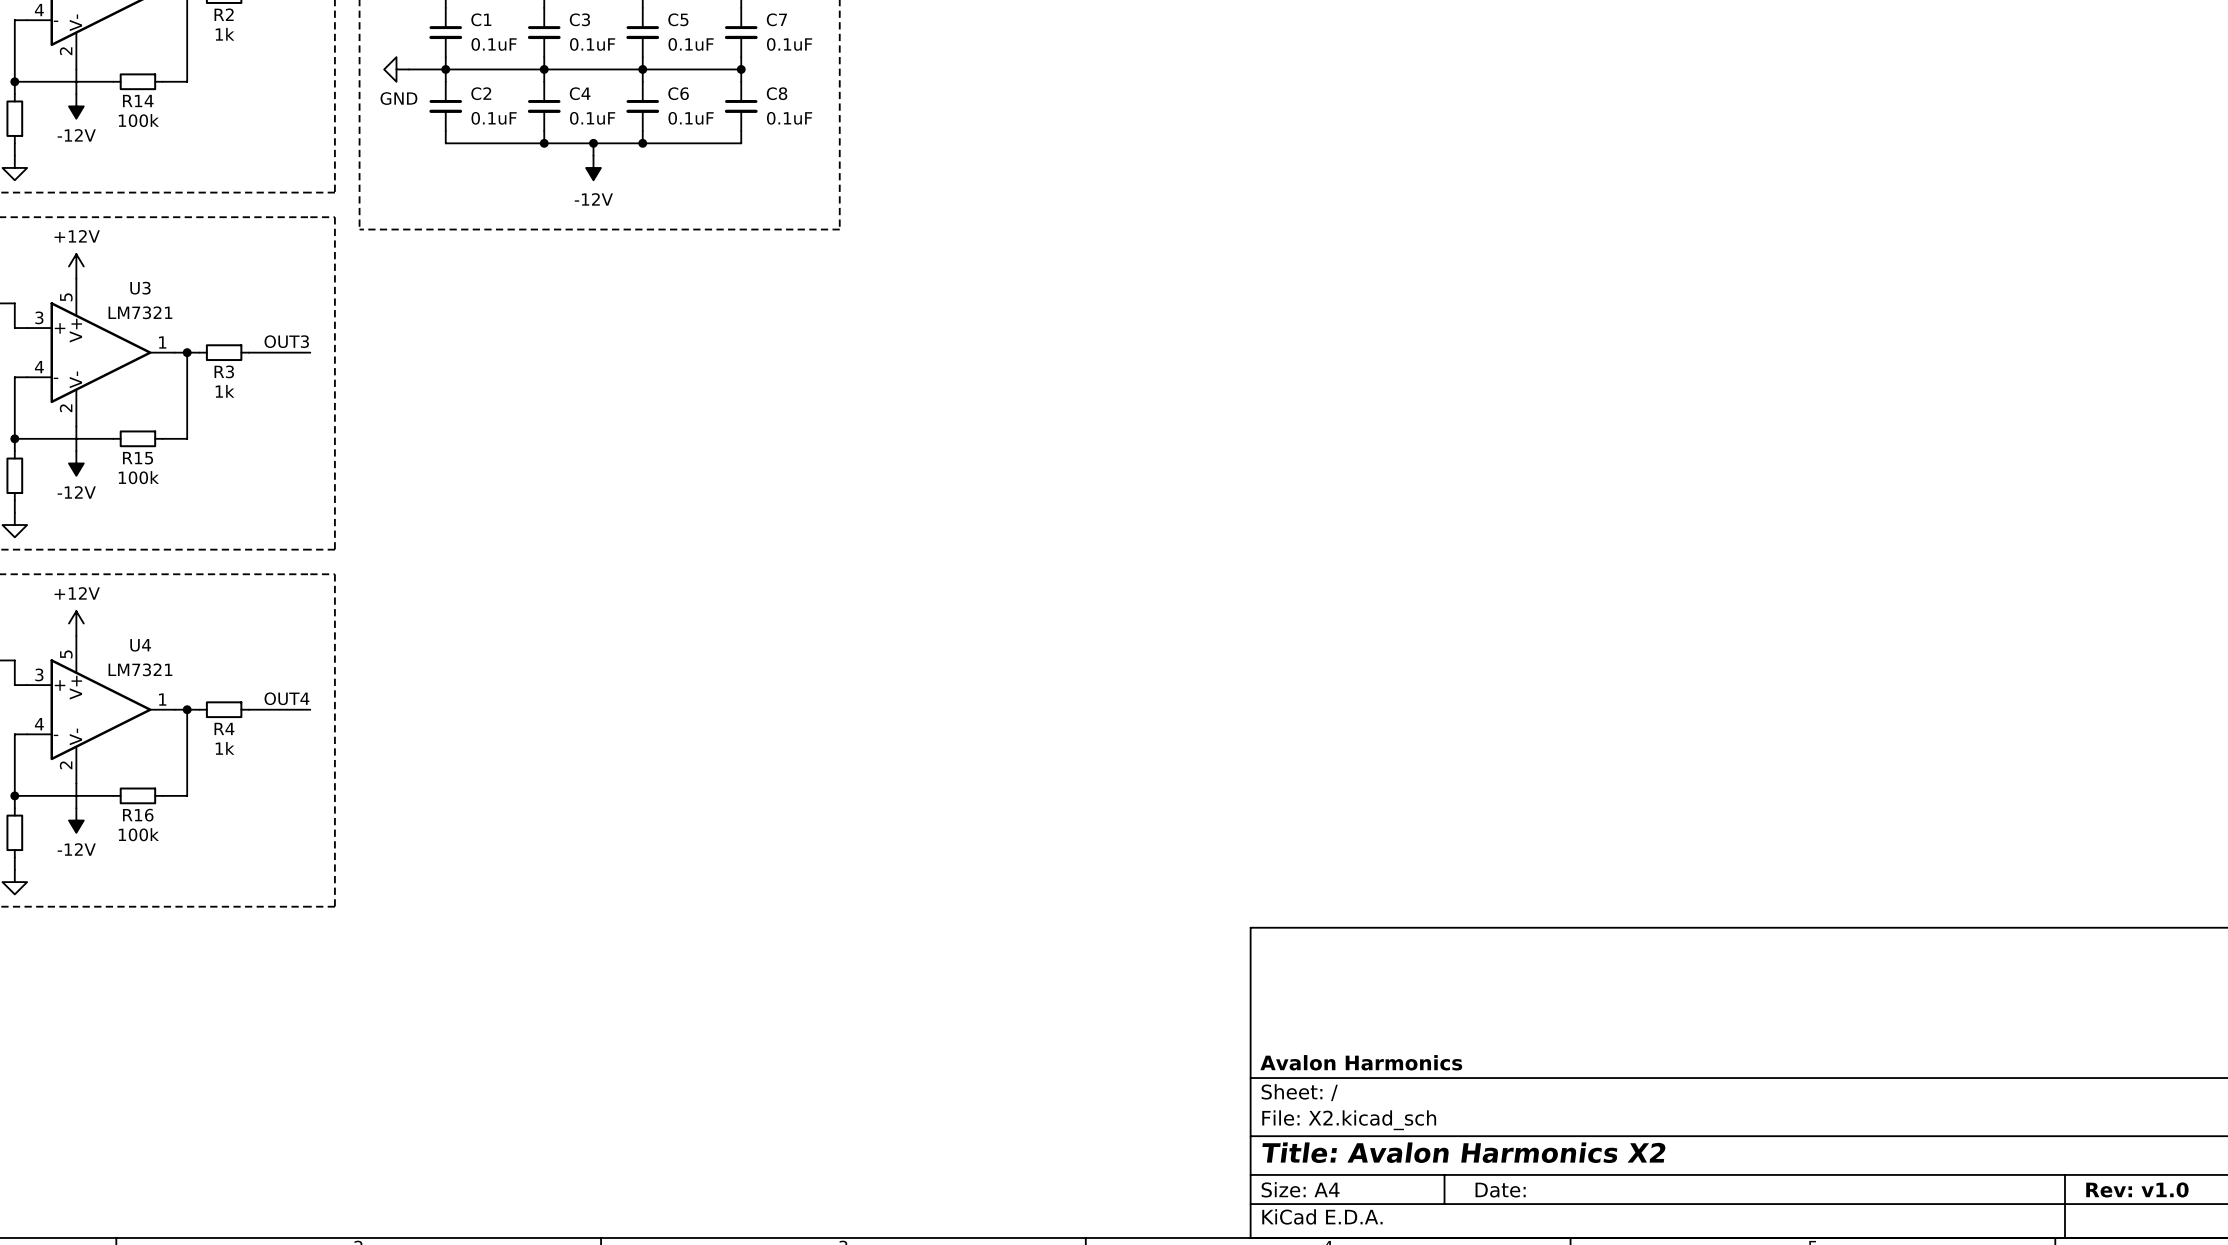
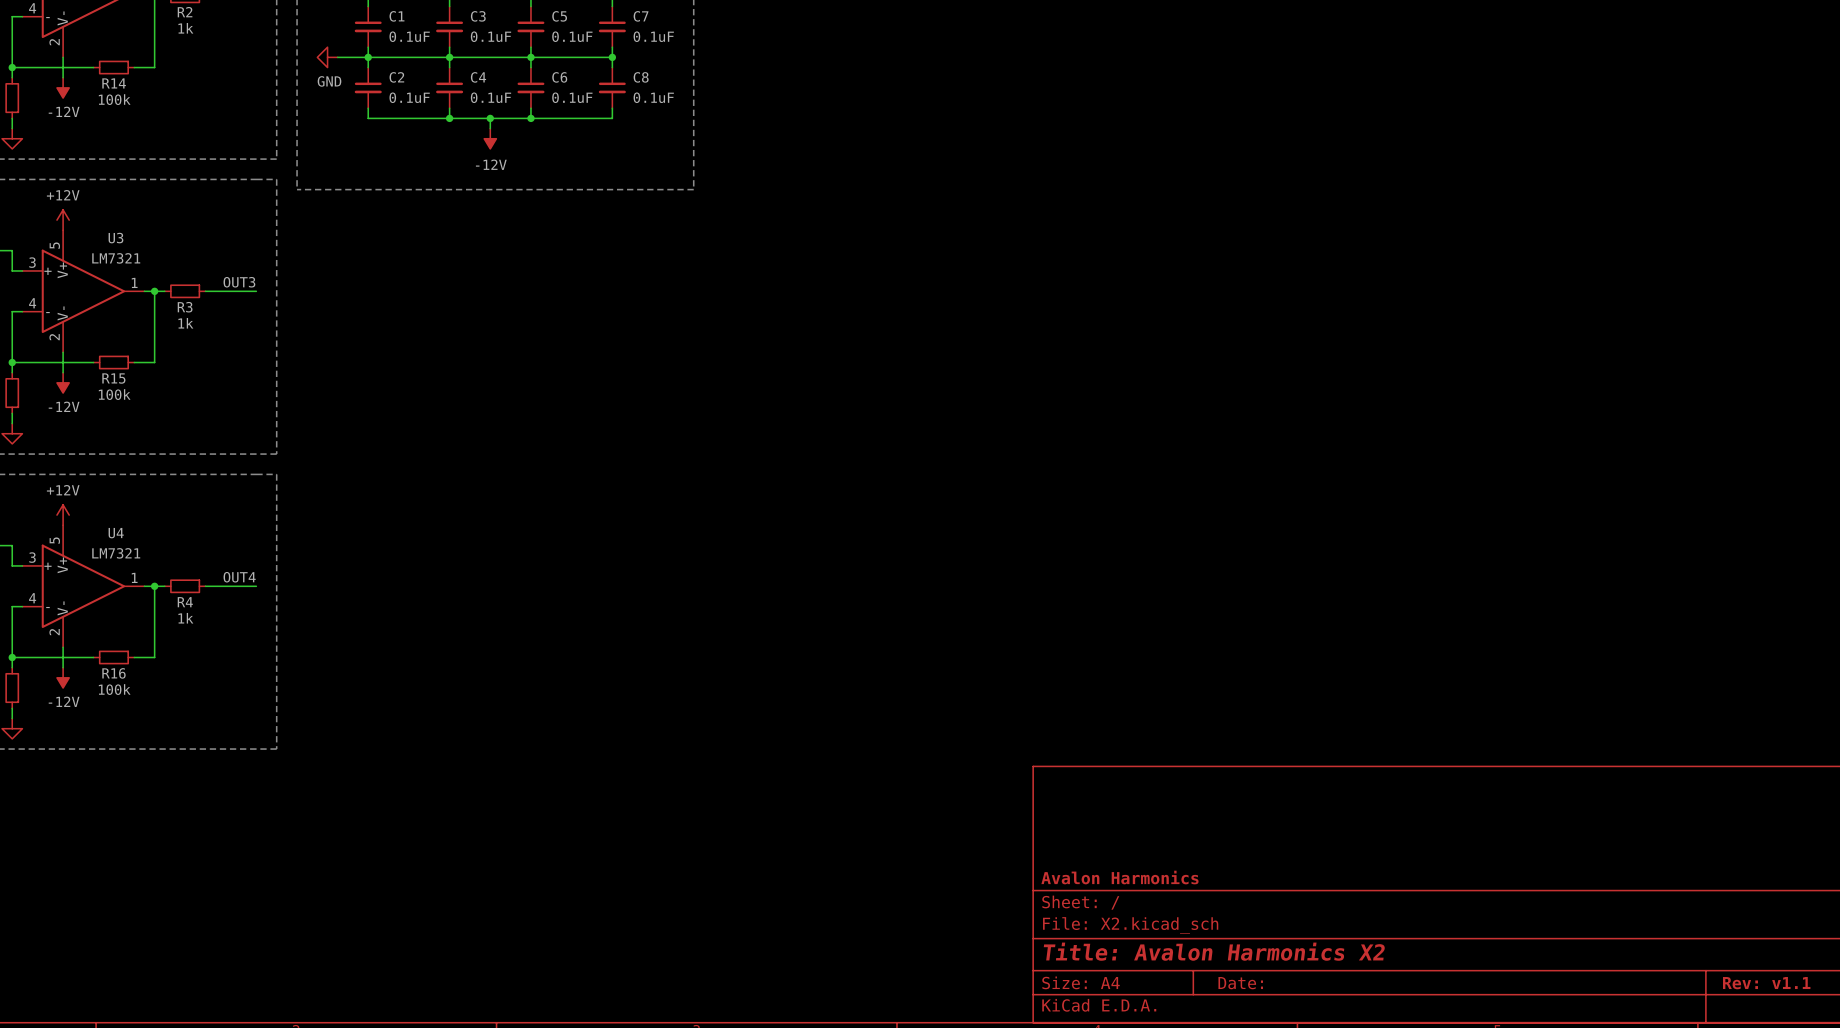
title block: Rev: v1.0 (2137, 1189) -> Rev: v1.1 (1766, 983)

